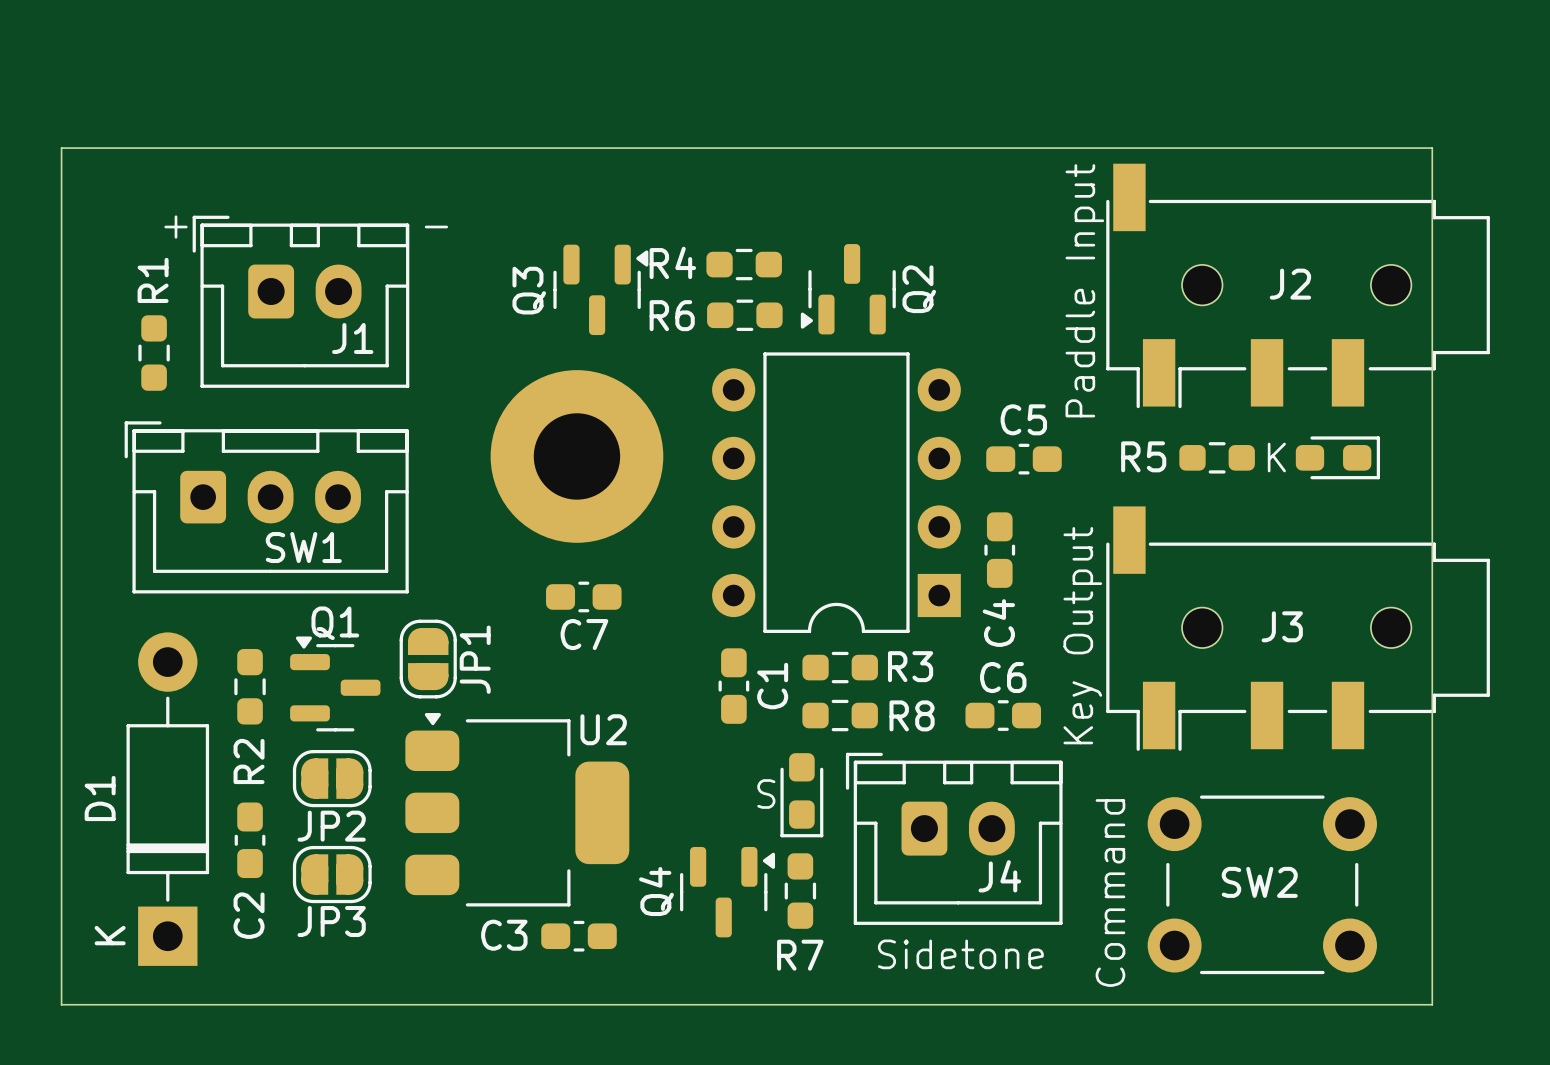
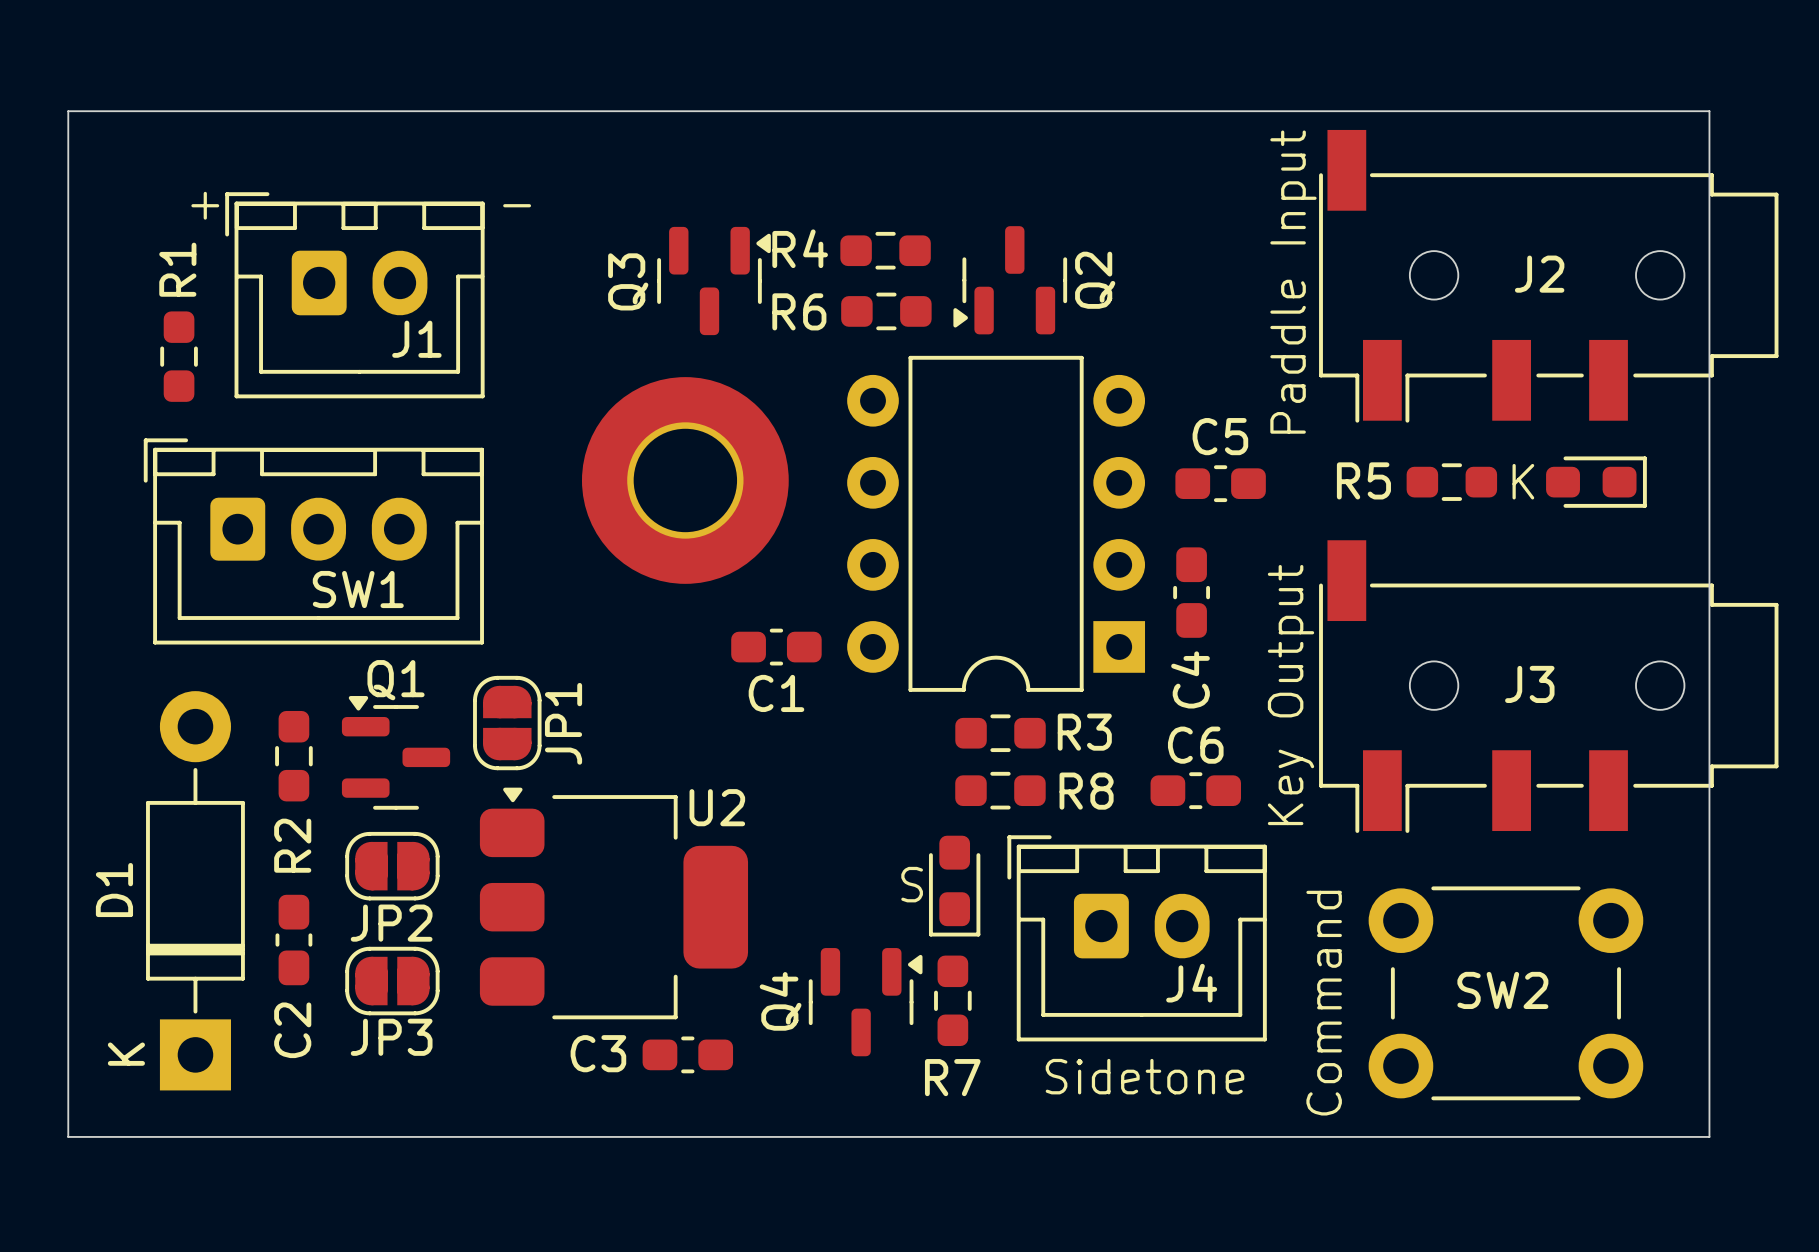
C7: (583, 596) -> none
C1 rotation: 0° (733, 686) -> 90° clockwise (776, 647)
C1 position: (733, 686) -> (776, 647)

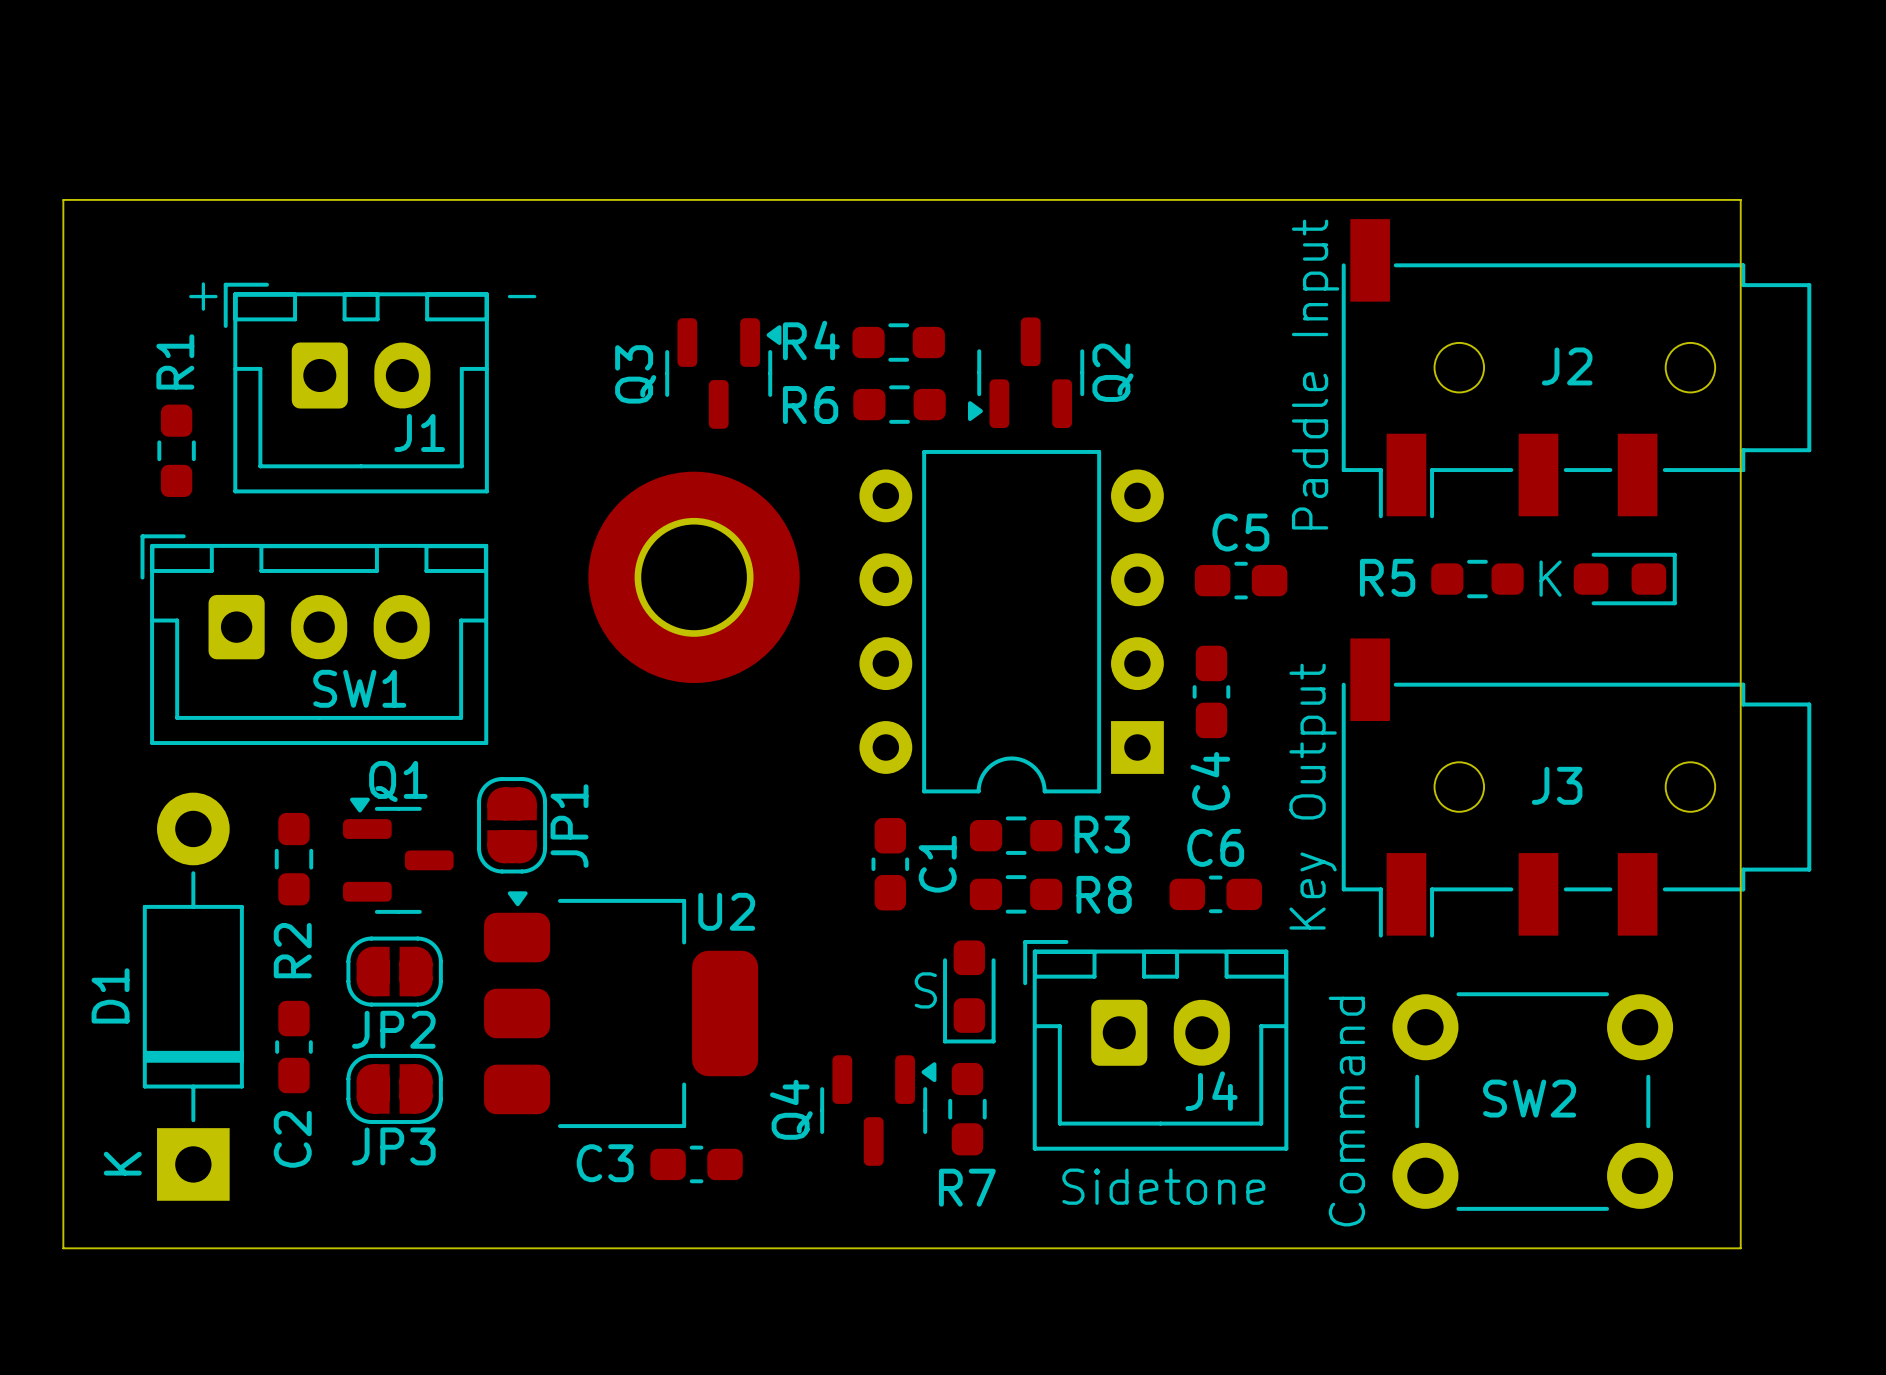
C1 rotation: 0° (776, 647) -> 90° clockwise (890, 864)
C1 position: (776, 647) -> (890, 864)
C1 name position: C1 (776, 693) -> C1 (937, 864)

